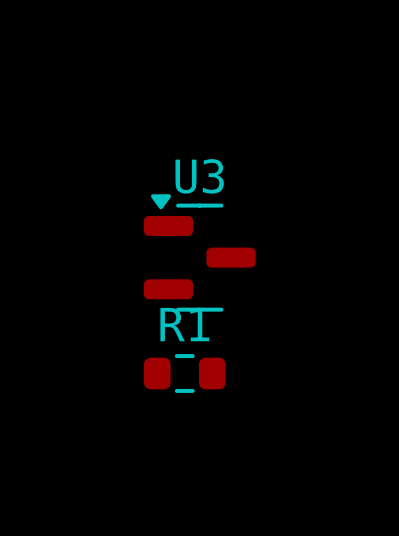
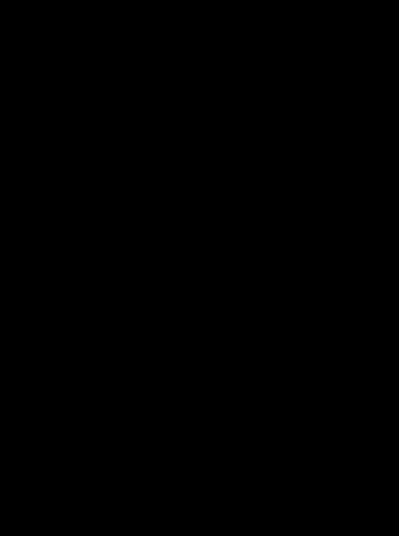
U3: (199, 252) -> none
R1: (184, 373) -> none

